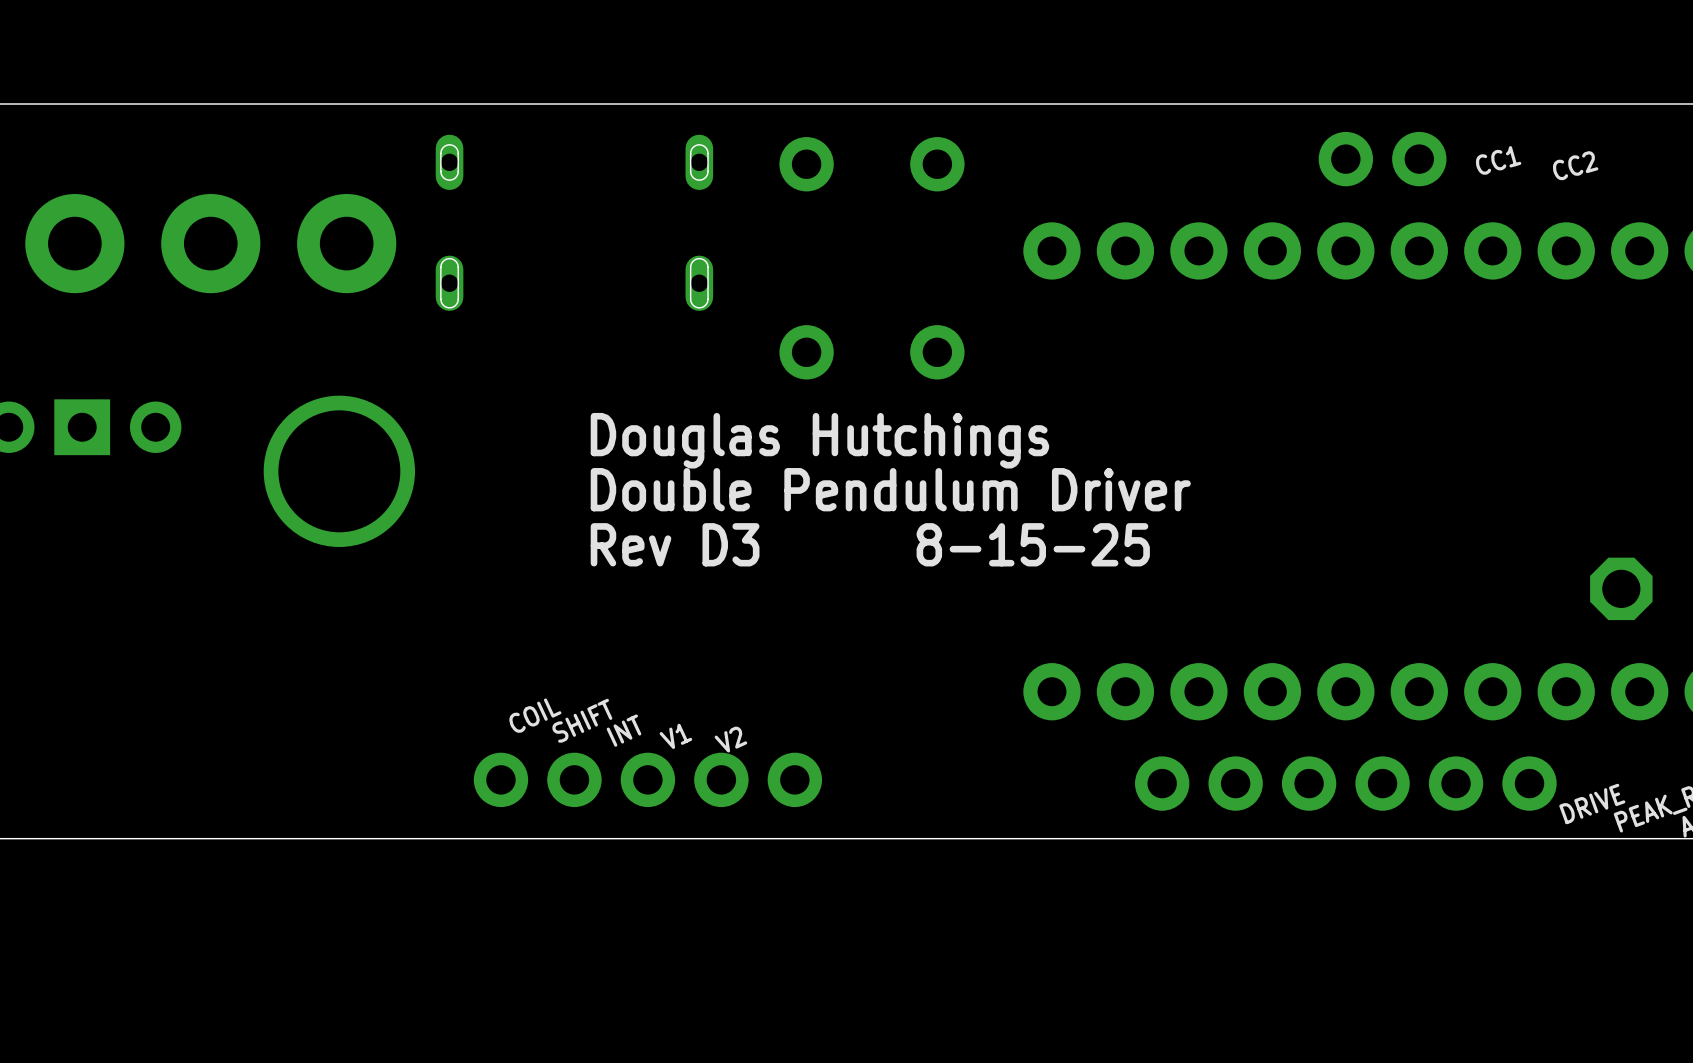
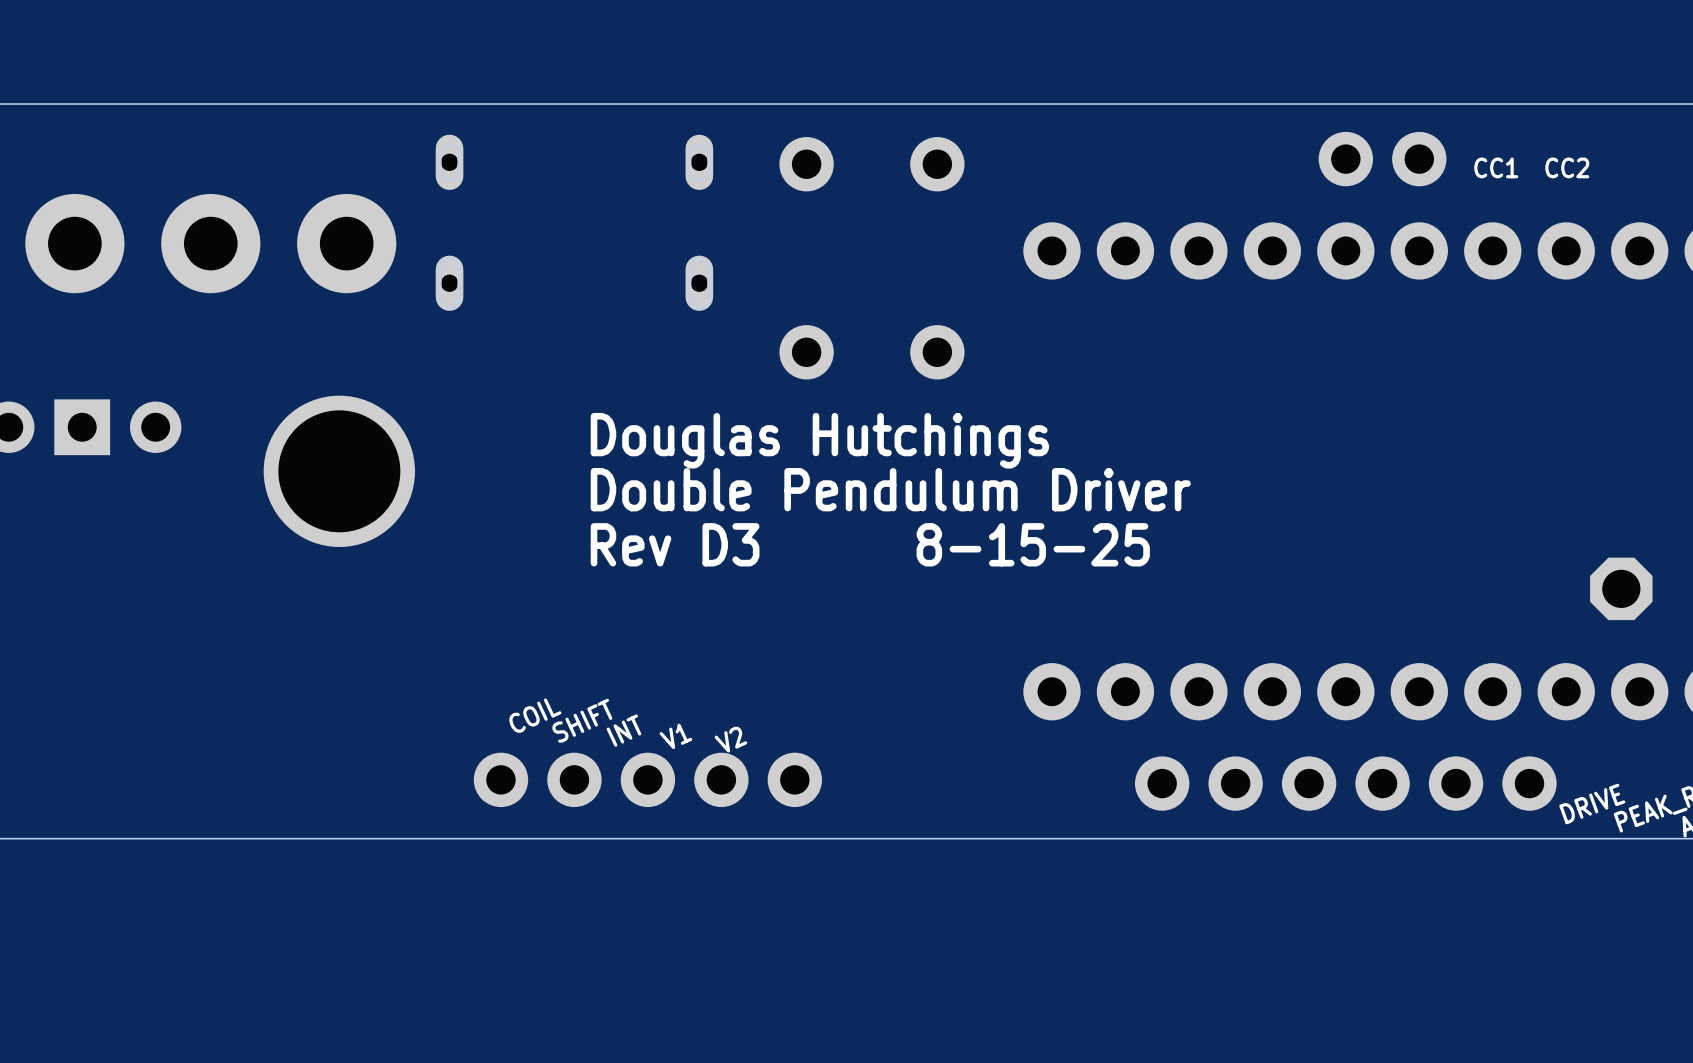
text: CC1 (1498, 160) -> CC1 CC2 (1531, 167)
text: CC2 (1575, 165) -> none

